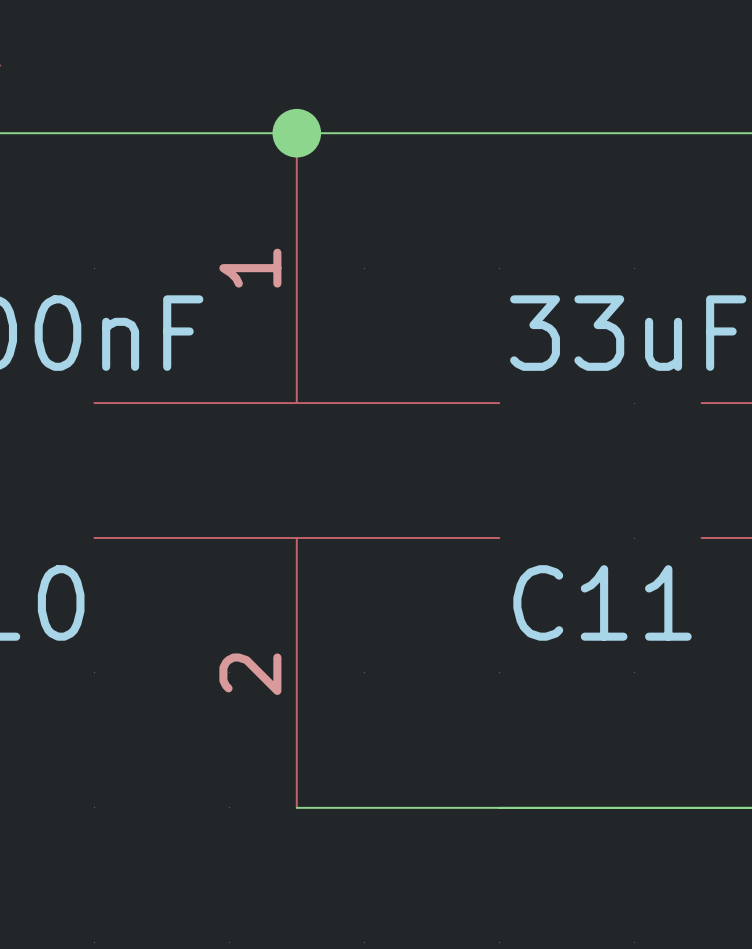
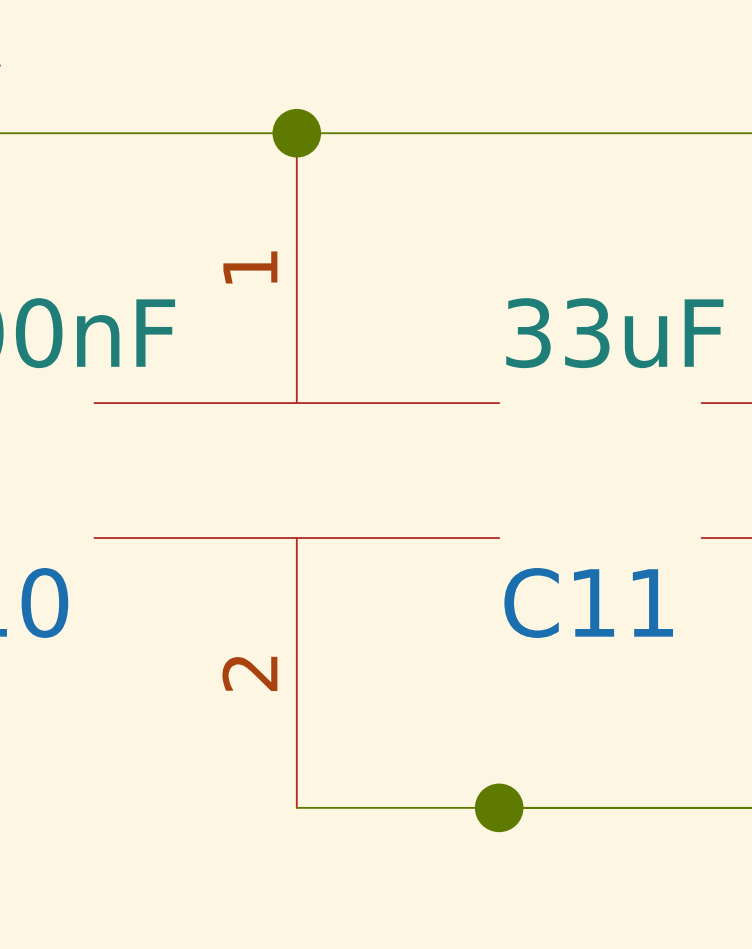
junction: none -> (499, 807)

